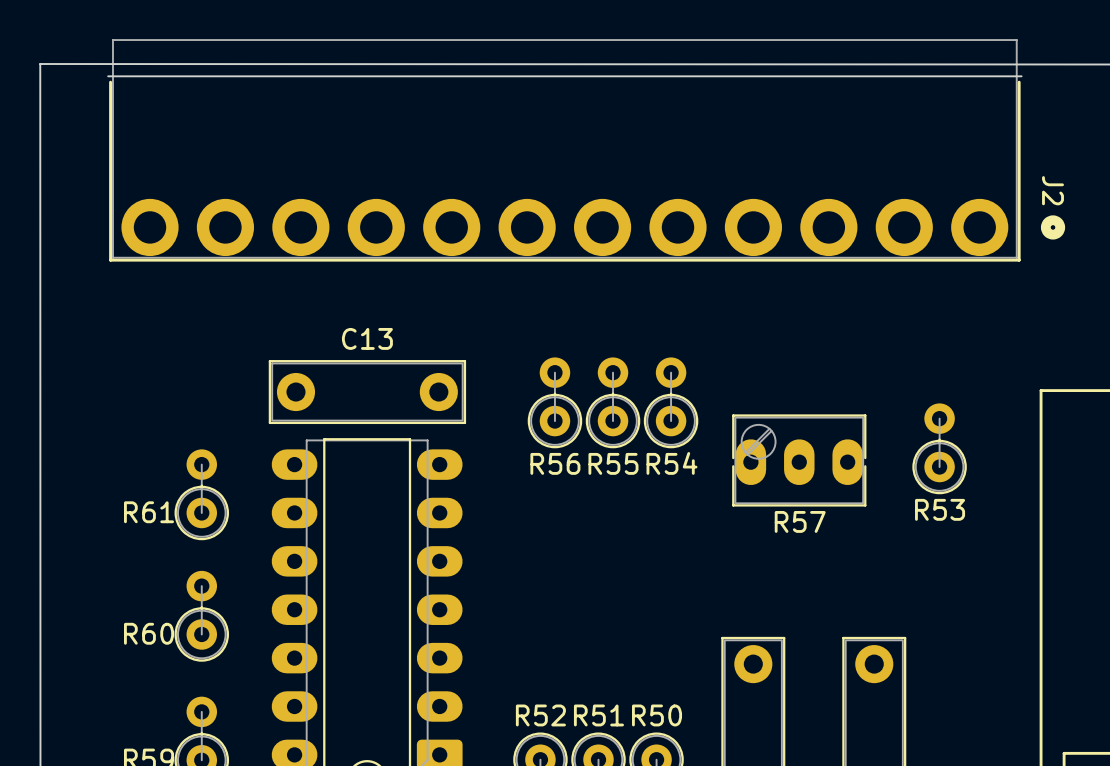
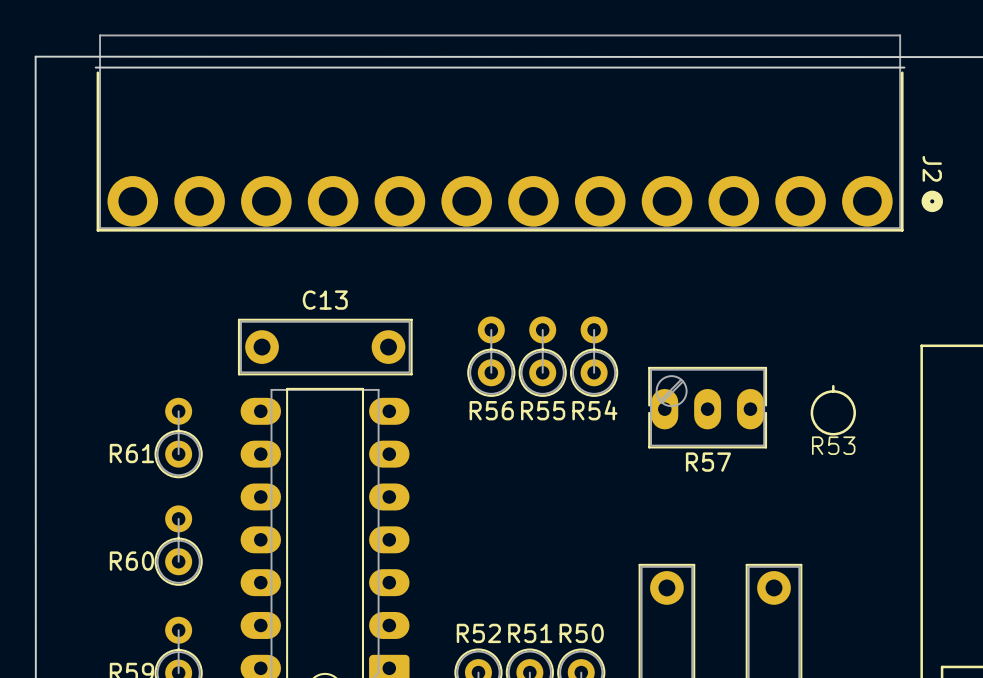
line: none -> (833, 386) (833, 391)
drawing: none -> [810, 390, 856, 436]
R53: (939, 448) -> none
text: none -> R53 (833, 445)

